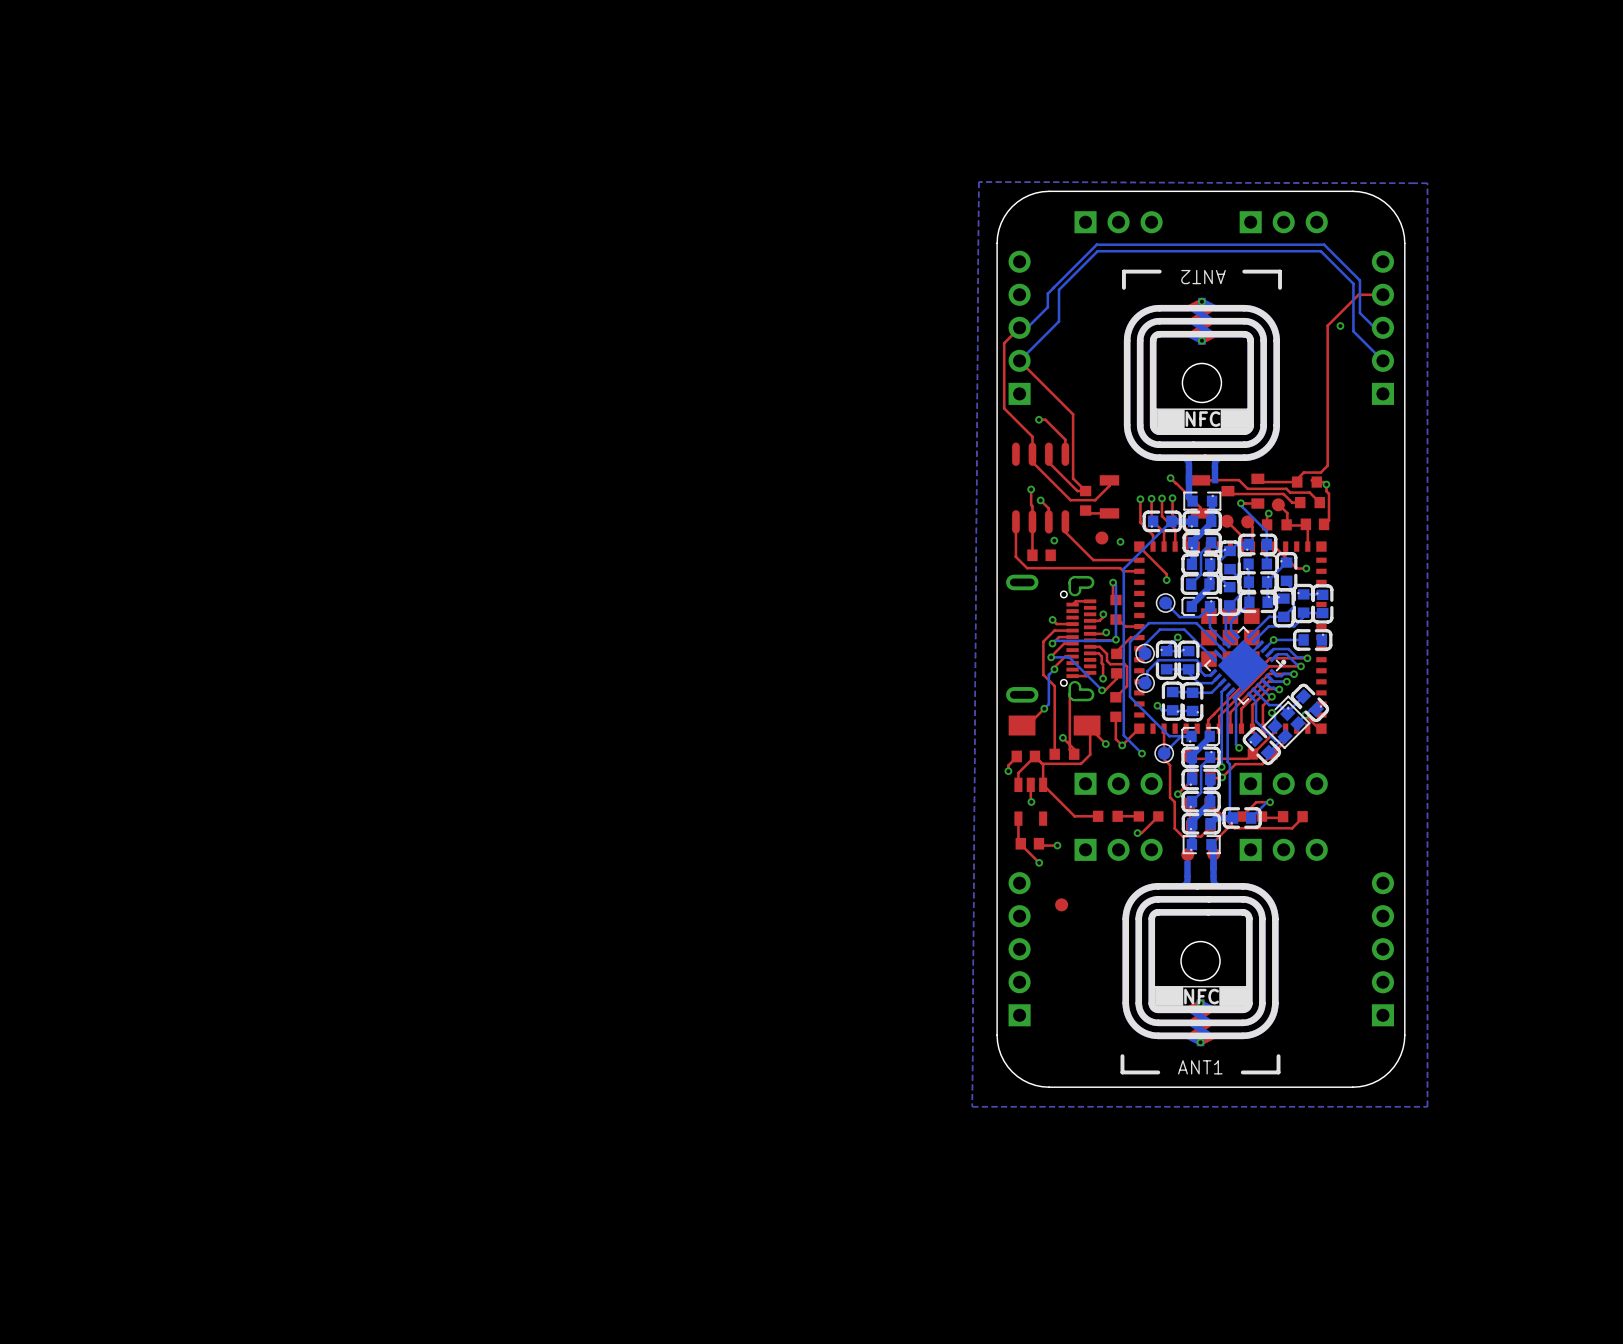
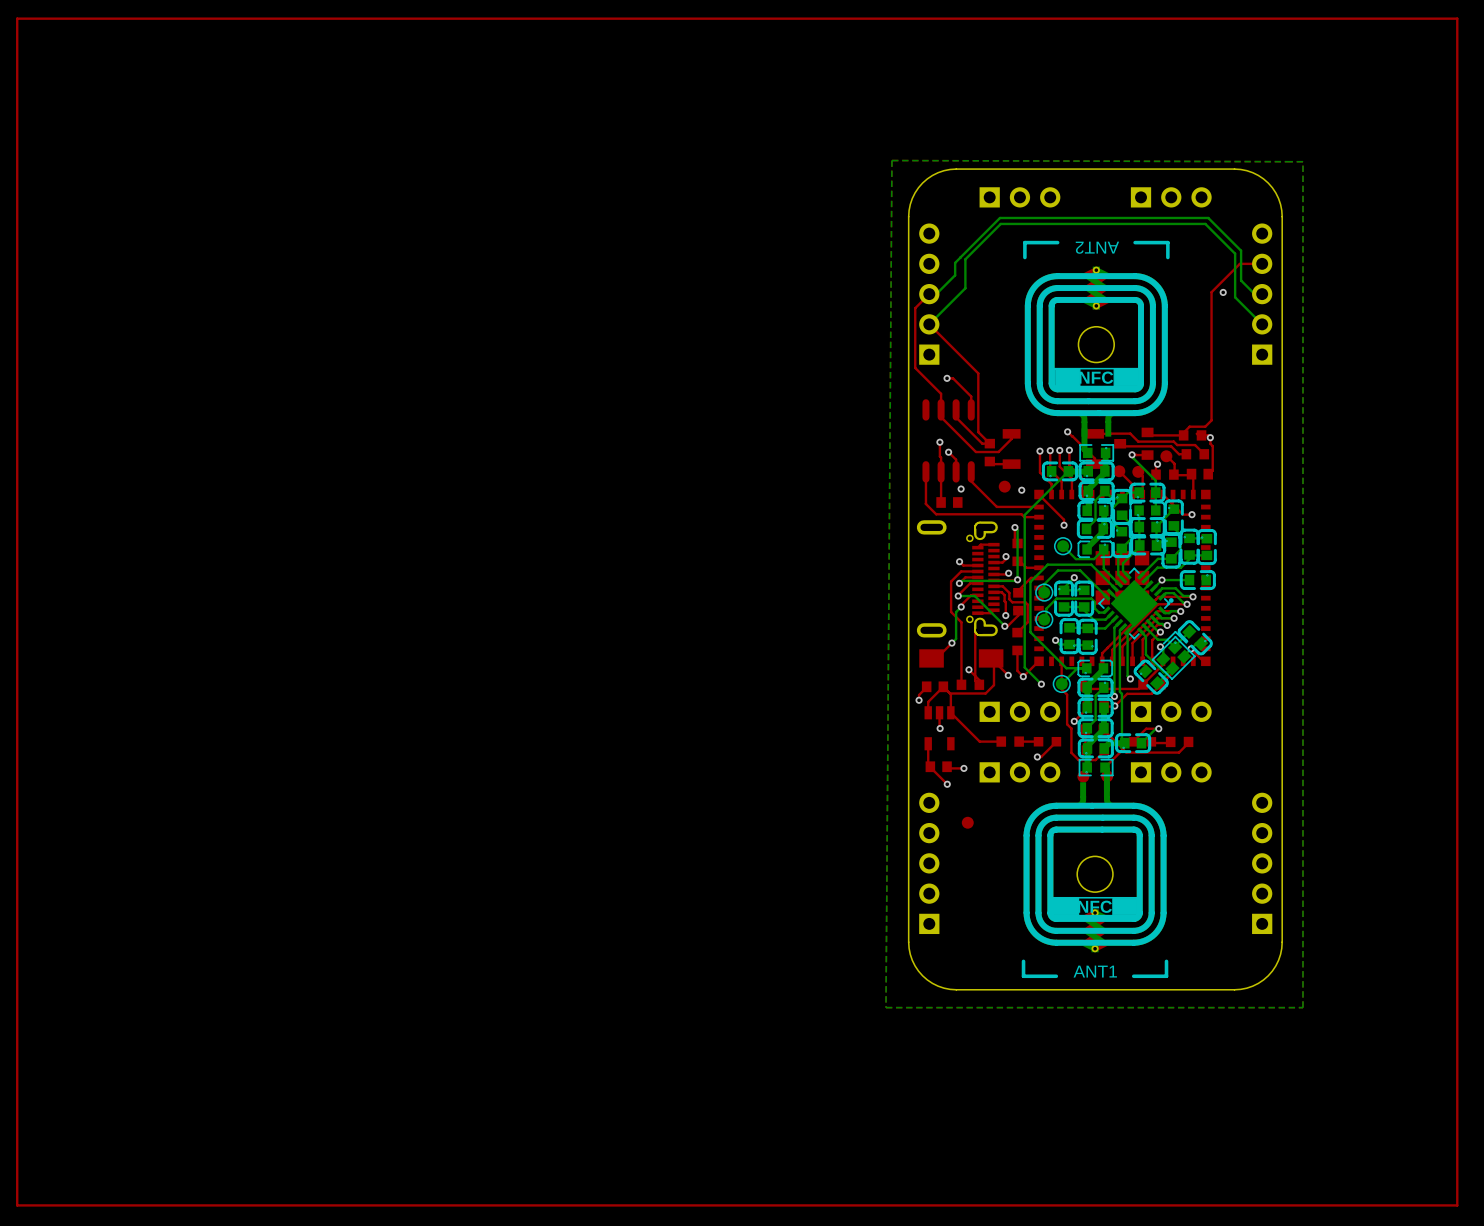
top track: none -> (1457, 18) (17, 18) (17, 1205) (1457, 1205) (1457, 18)

